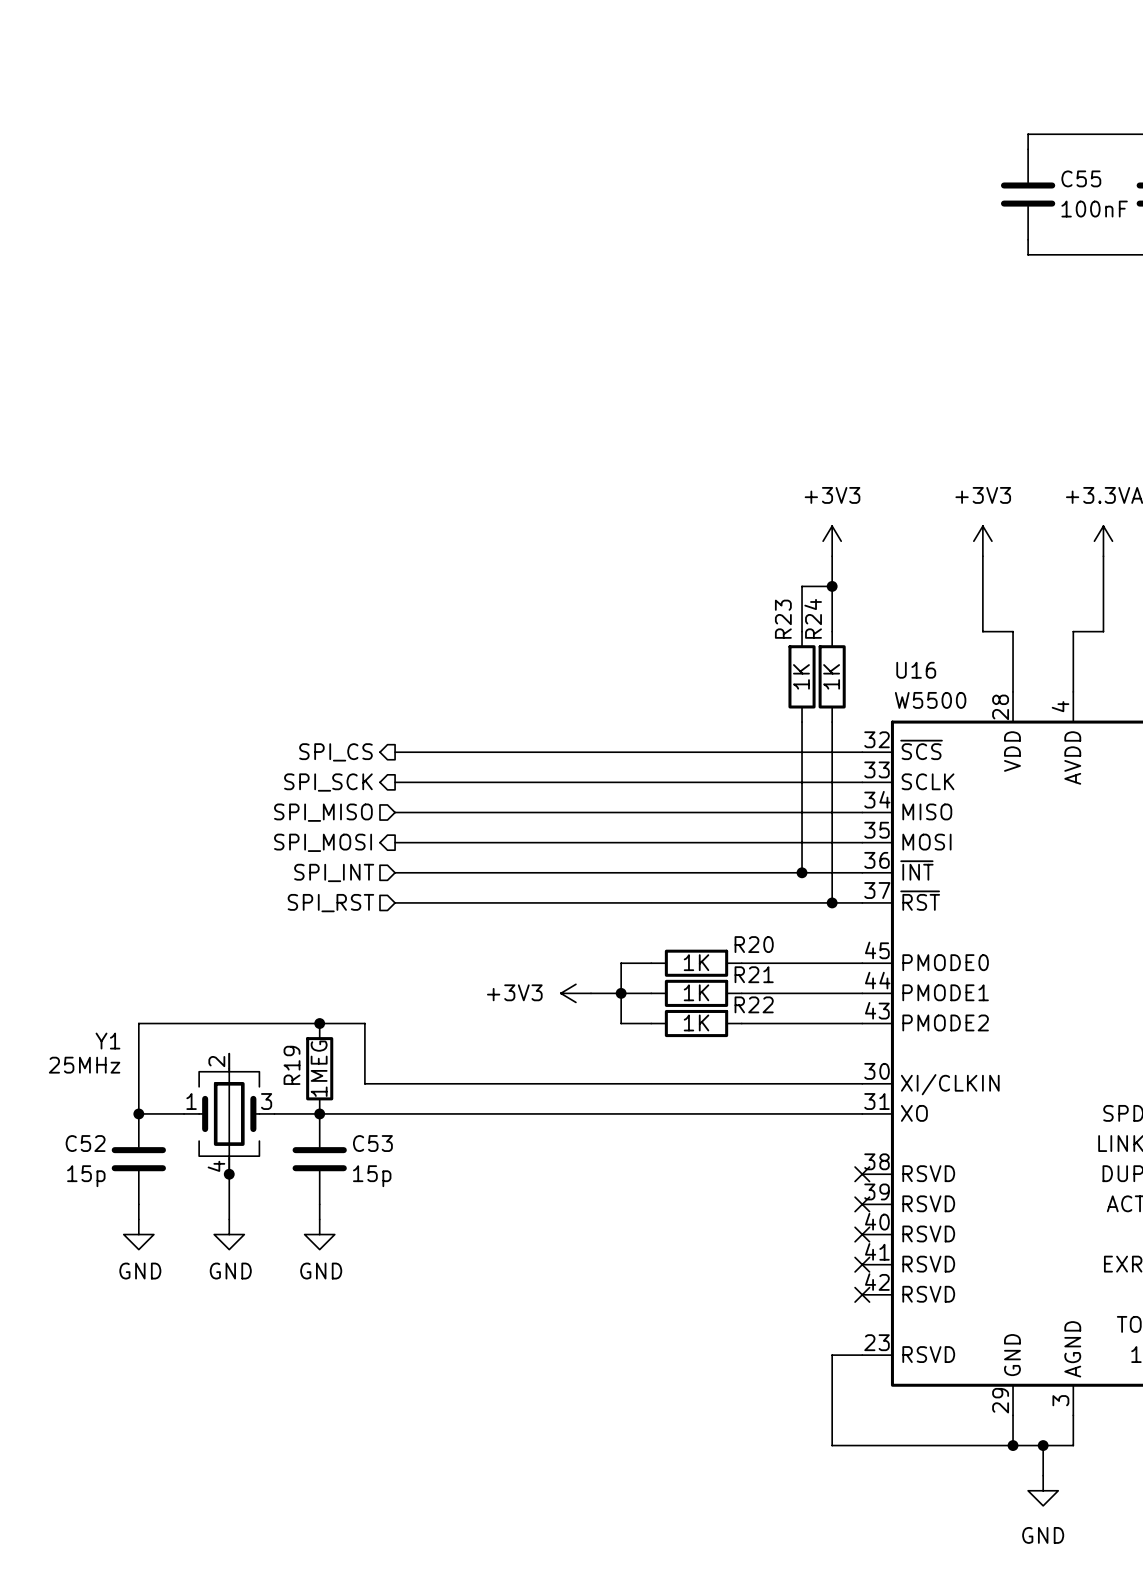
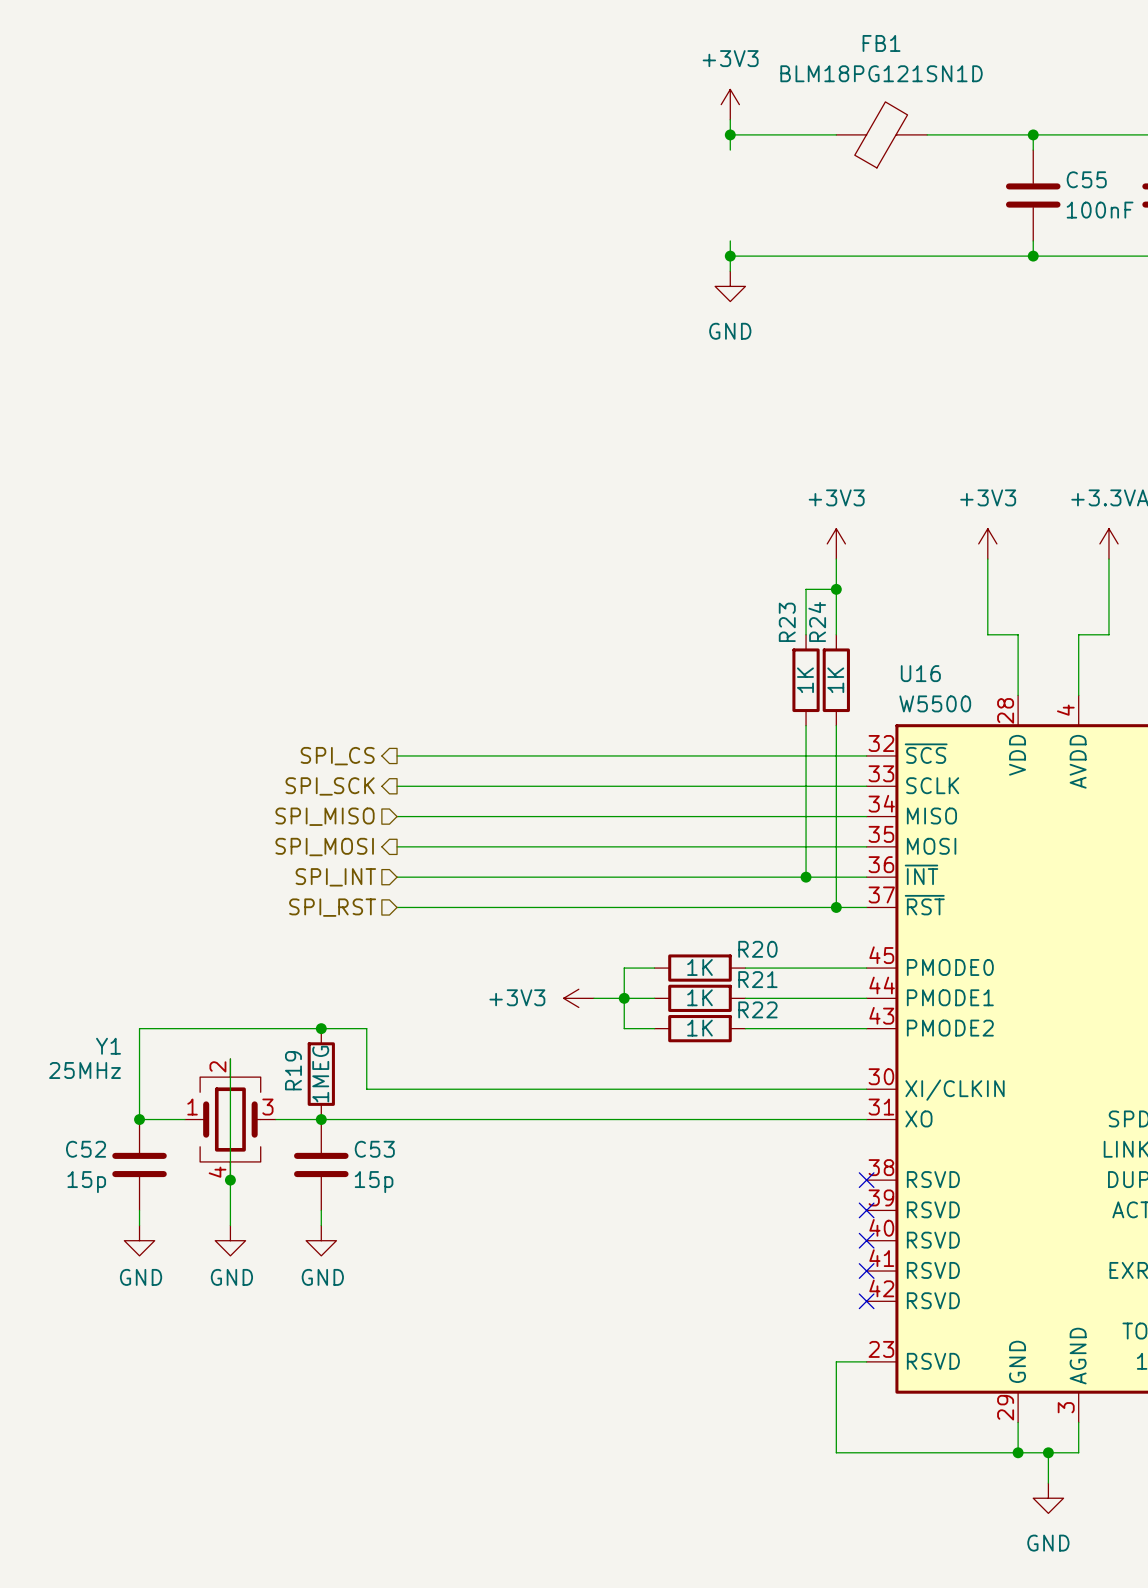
power symbol: none -> +3V3 (730, 104)
wire: none -> (730, 119) (730, 150)
wire: none -> (730, 134) (836, 134)
junction: none -> (730, 134)
FB1: none -> BLM18PG121SN1D (881, 134)
wire: none -> (927, 134) (1033, 134)
junction: none -> (1033, 134)
wire: none -> (730, 240) (730, 271)
wire: none -> (730, 256) (1033, 256)
junction: none -> (730, 256)
junction: none -> (1033, 256)
power symbol: none -> GND (730, 286)

